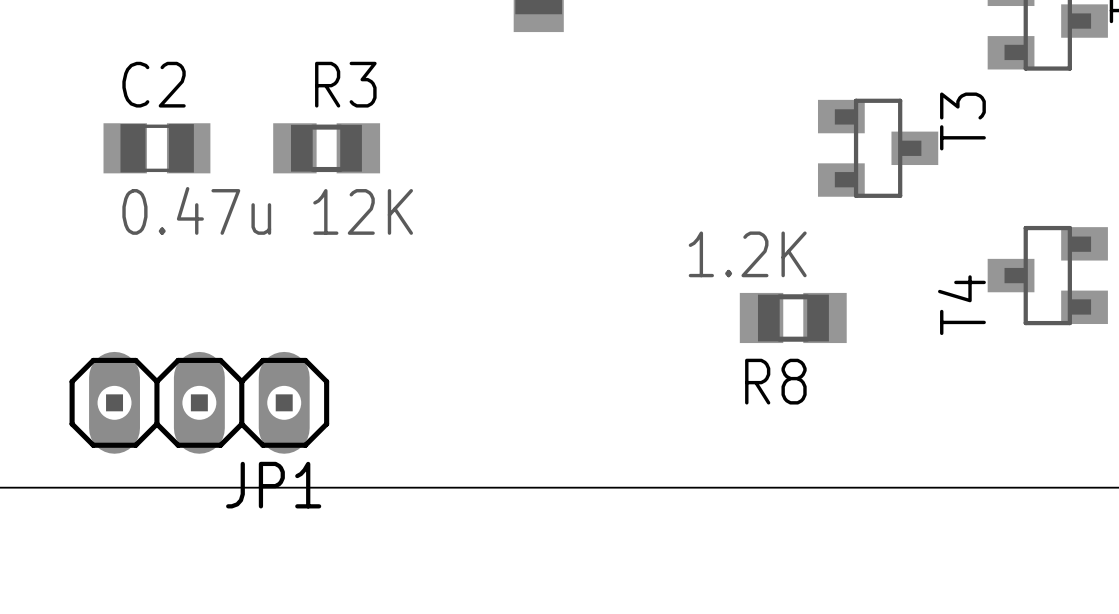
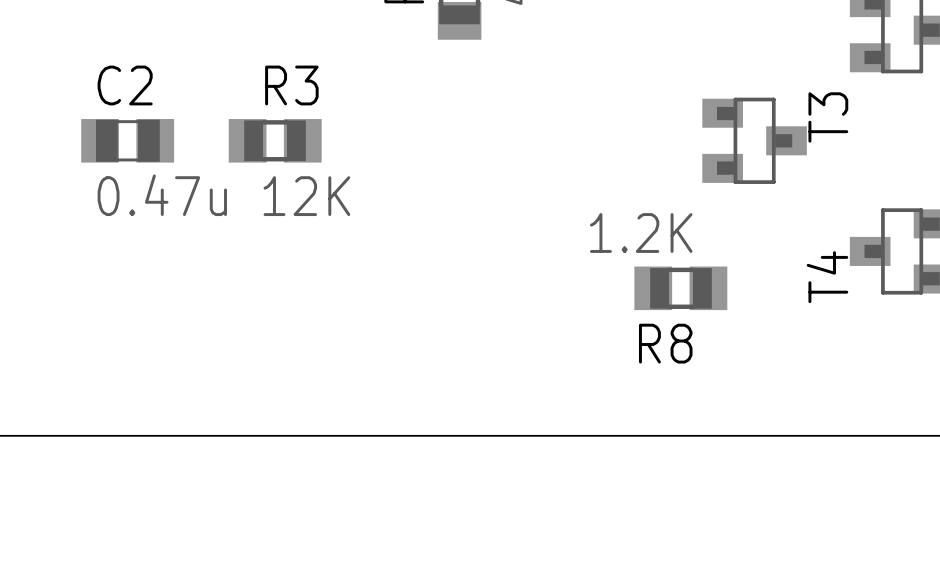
JP1: (199, 402) -> none

